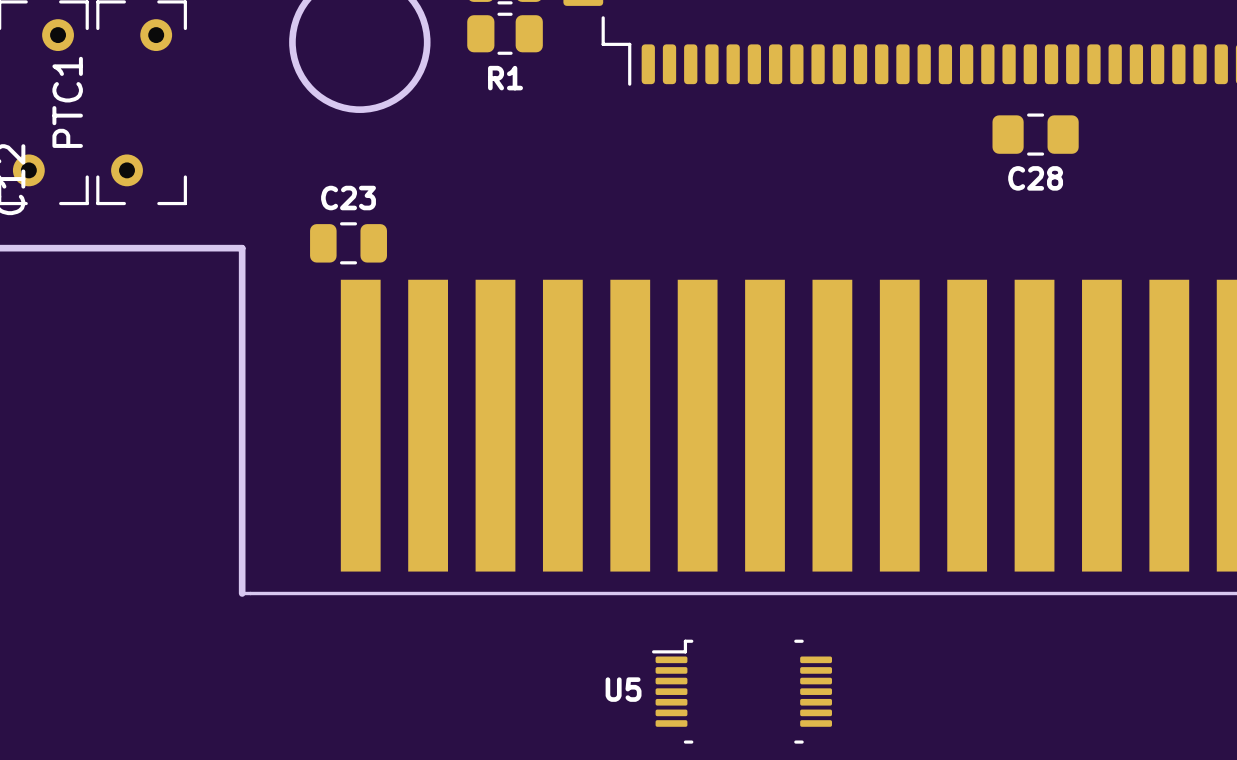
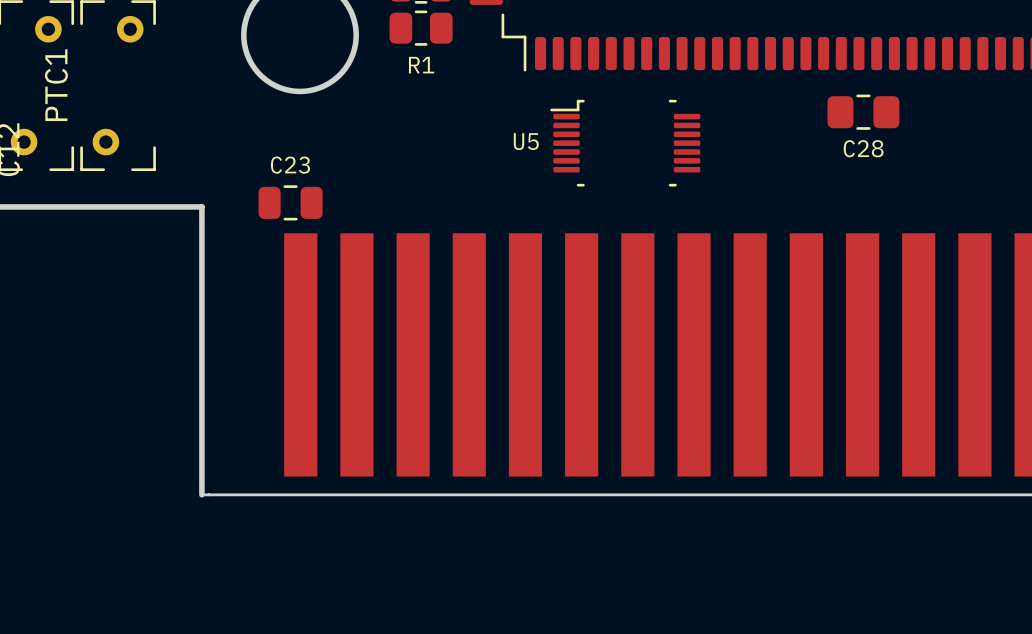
U5 position: (742, 691) -> (625, 143)

